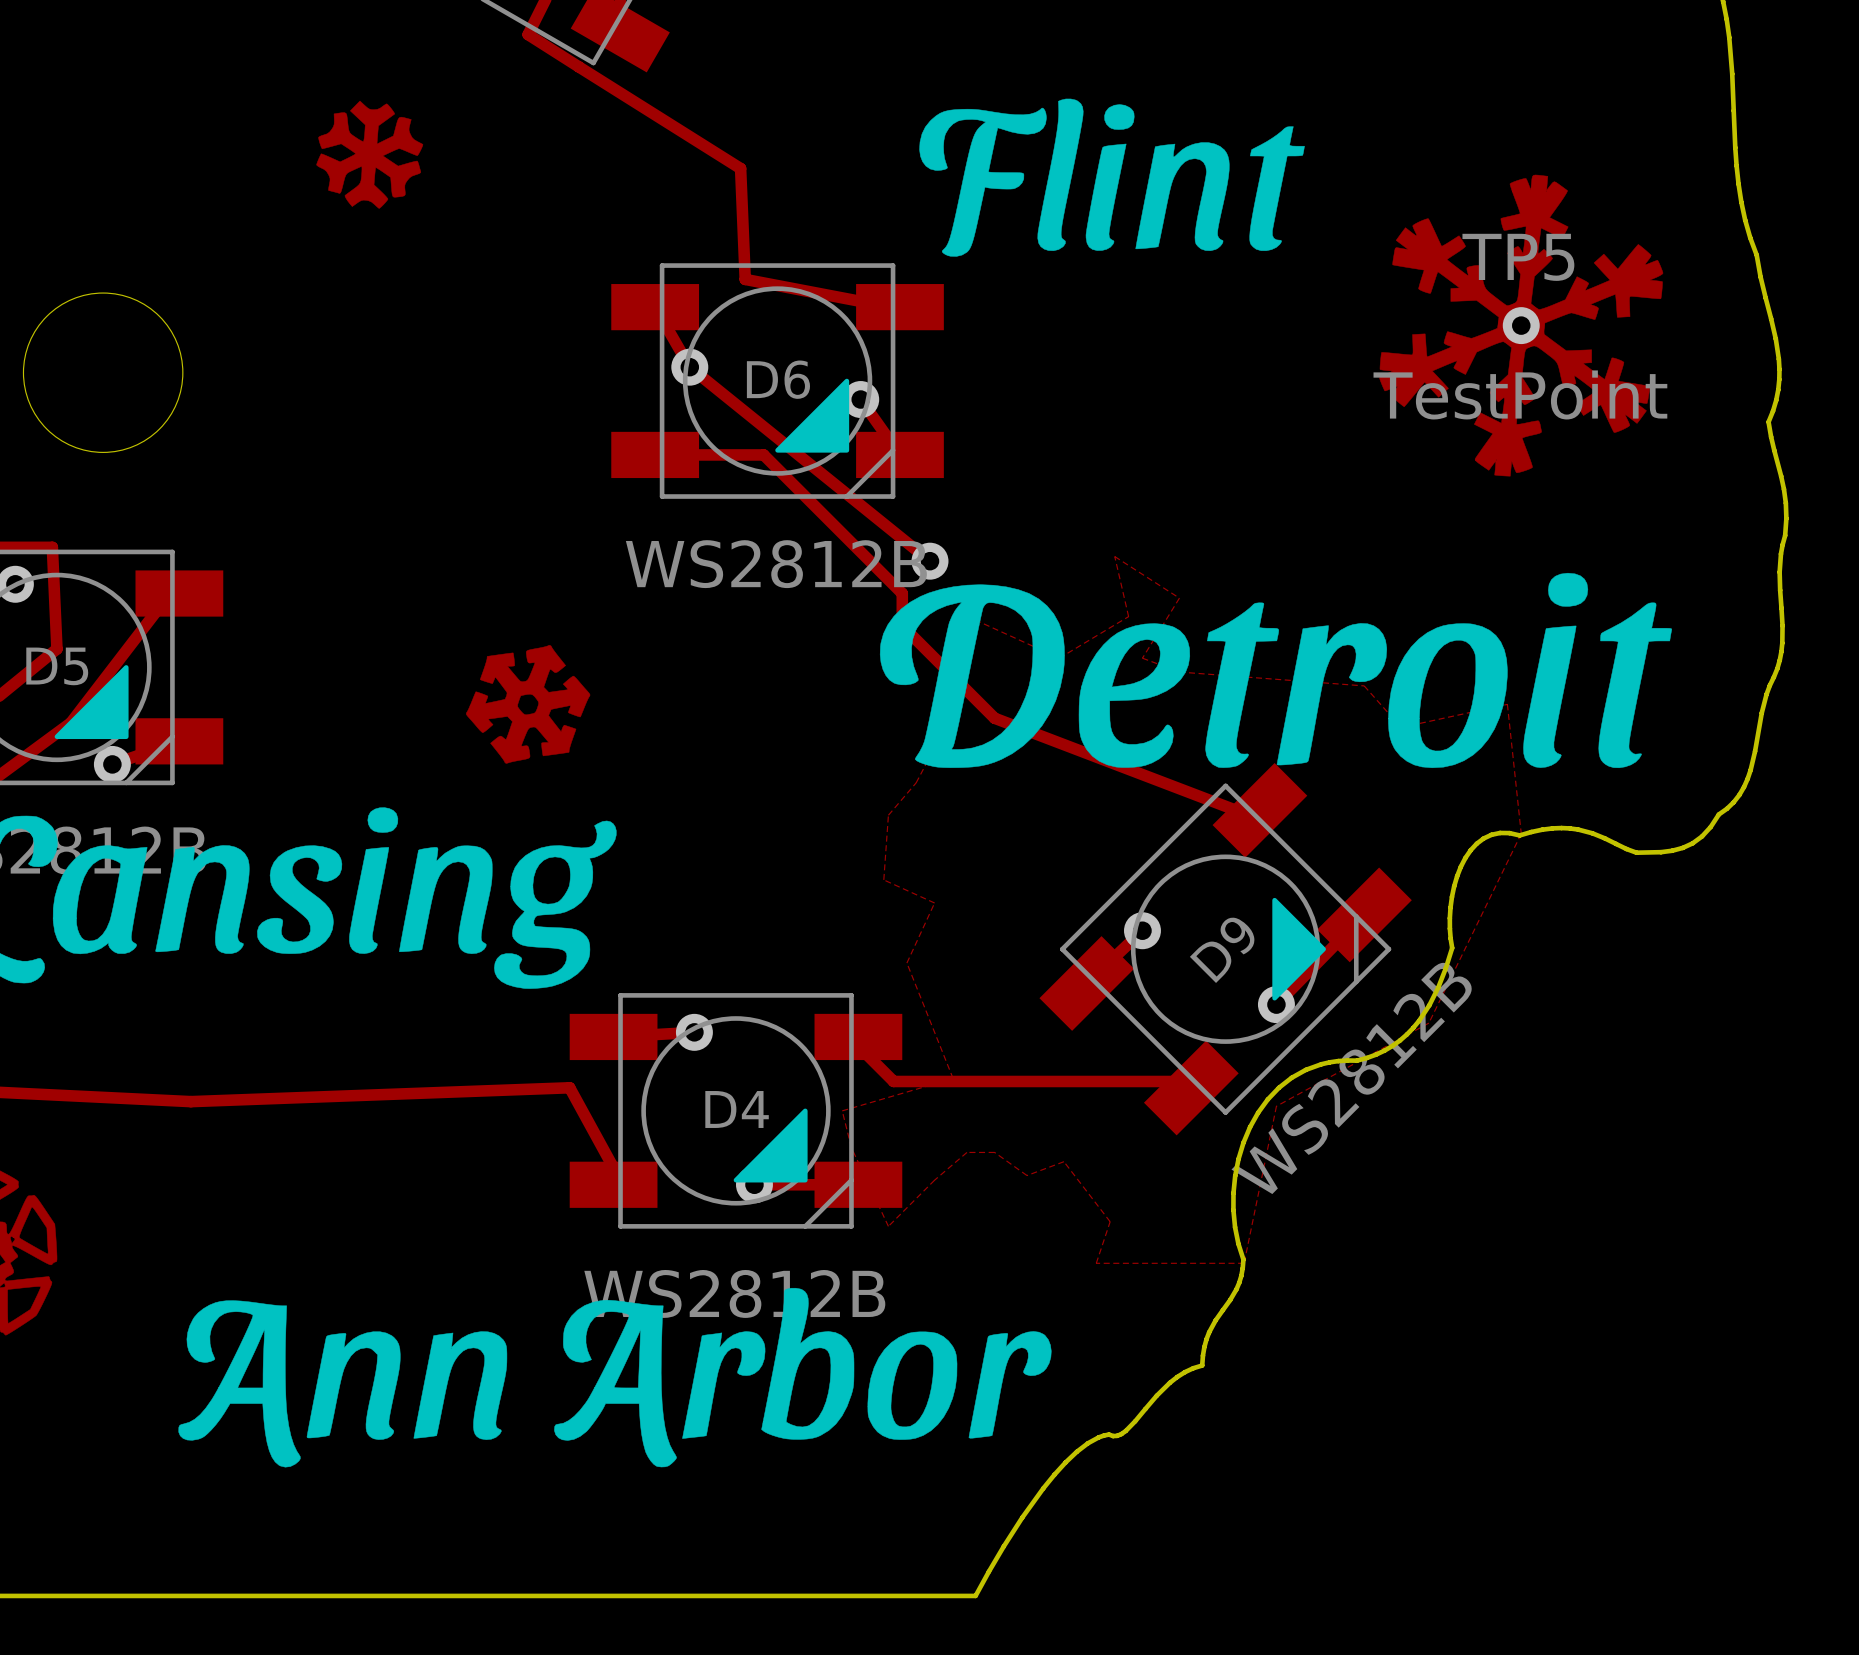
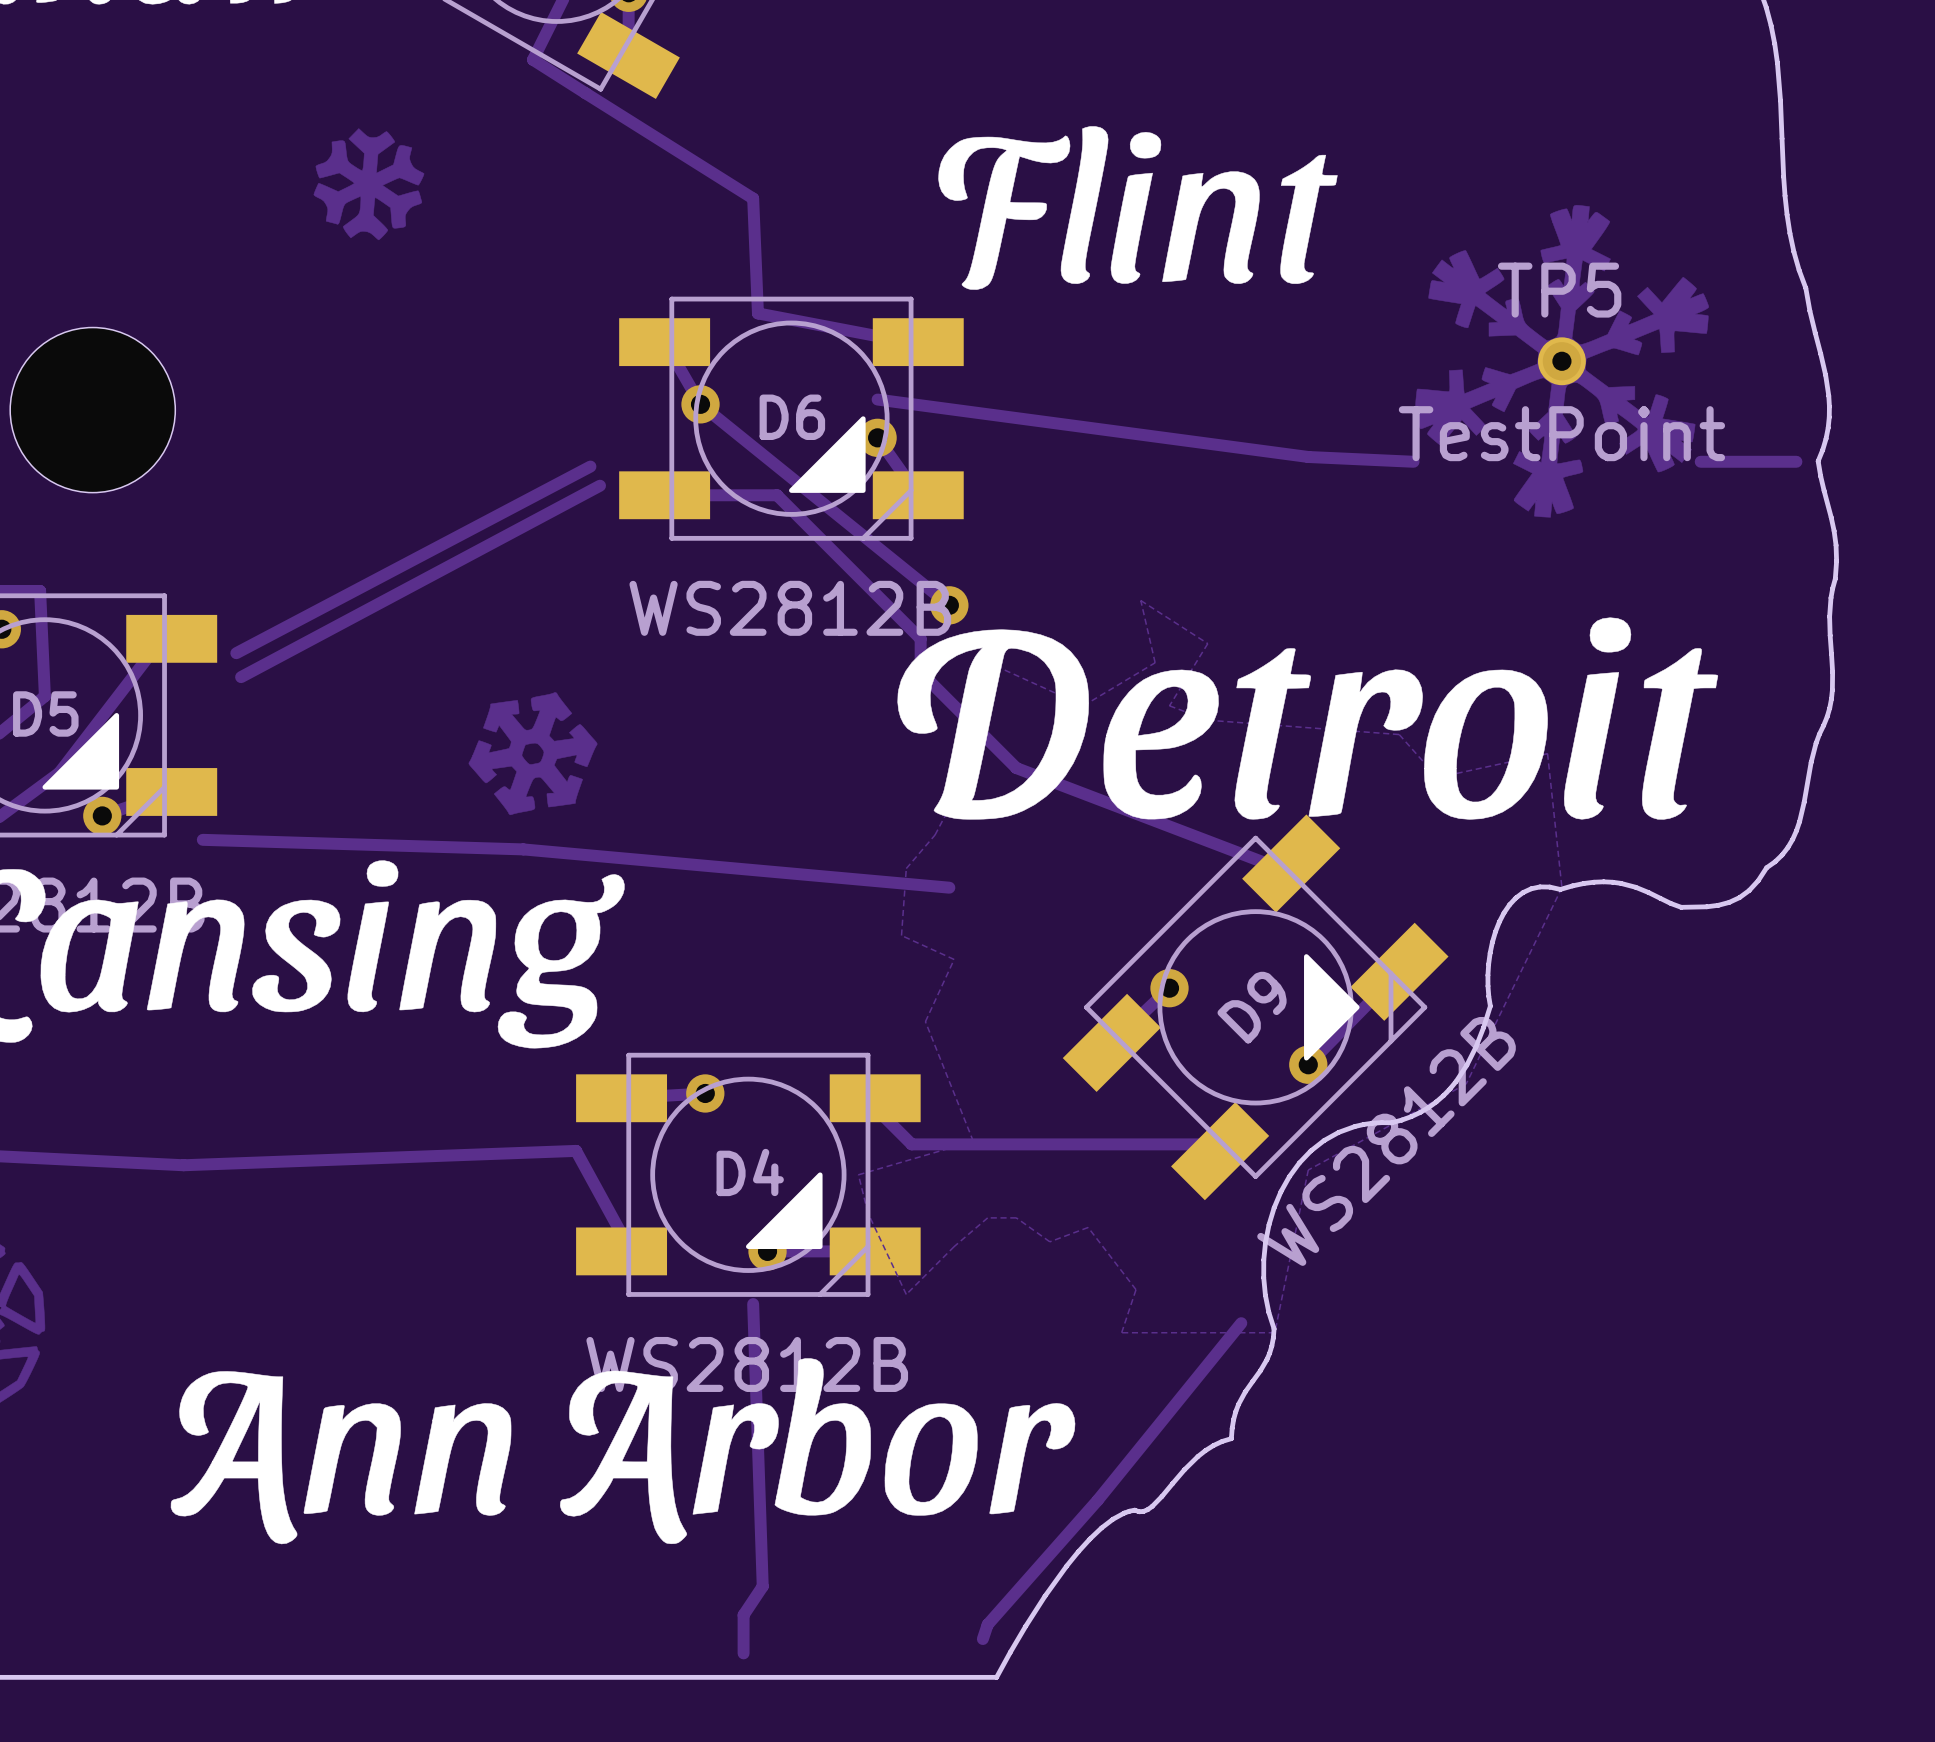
track: none -> (877, 399) (1308, 456) (1413, 461)
track: none -> (1700, 461) (1796, 461)
track: none -> (590, 466) (236, 653)
track: none -> (600, 485) (241, 677)
track: none -> (202, 839) (523, 849) (949, 887)
track: none -> (753, 1304) (762, 1586) (743, 1615) (743, 1653)
track: none -> (1241, 1323) (1097, 1500) (987, 1624) (982, 1639)

